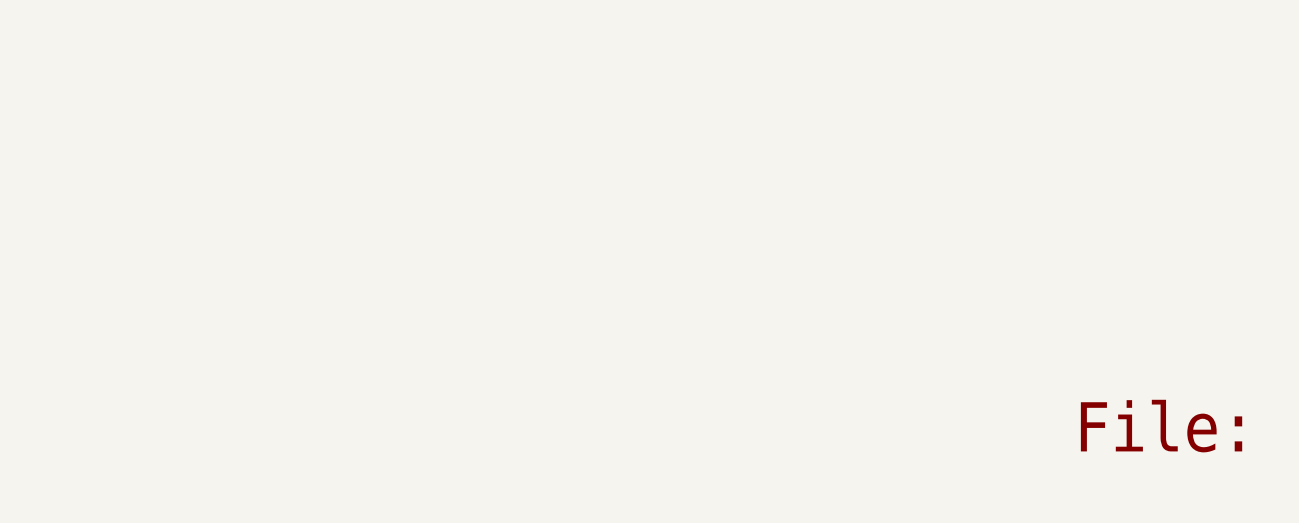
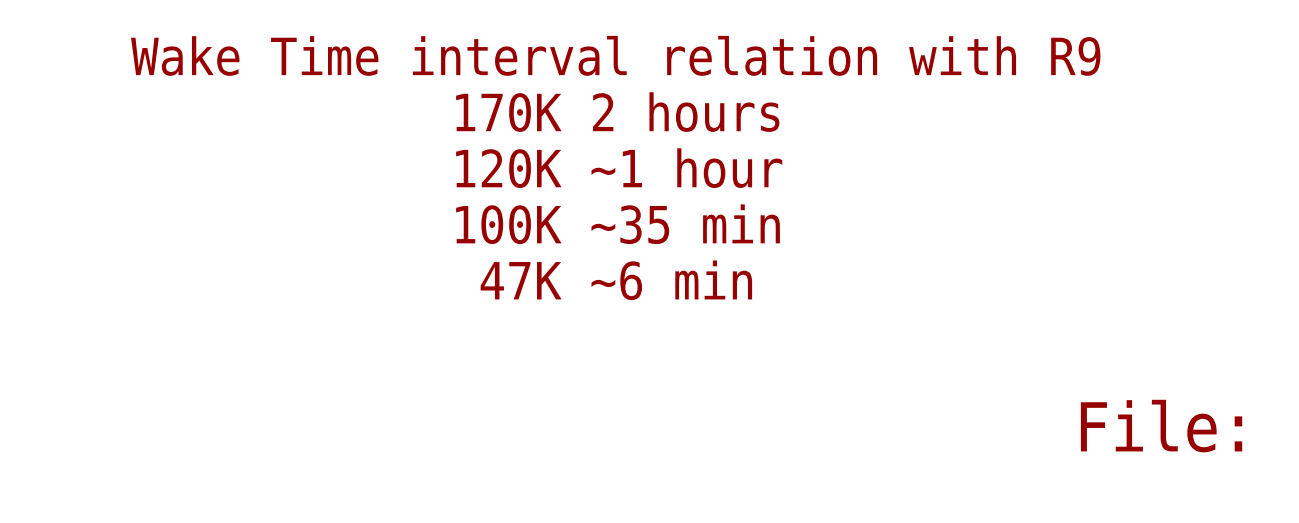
text: none -> Wake Time interval relation with R9 (615, 55)
text: none -> 170K 2 hours (617, 112)
text: none -> 120K ~1 hour (619, 168)
text: none -> 100K ~35 min (618, 224)
text: none -> 47K ~6 min (616, 280)

